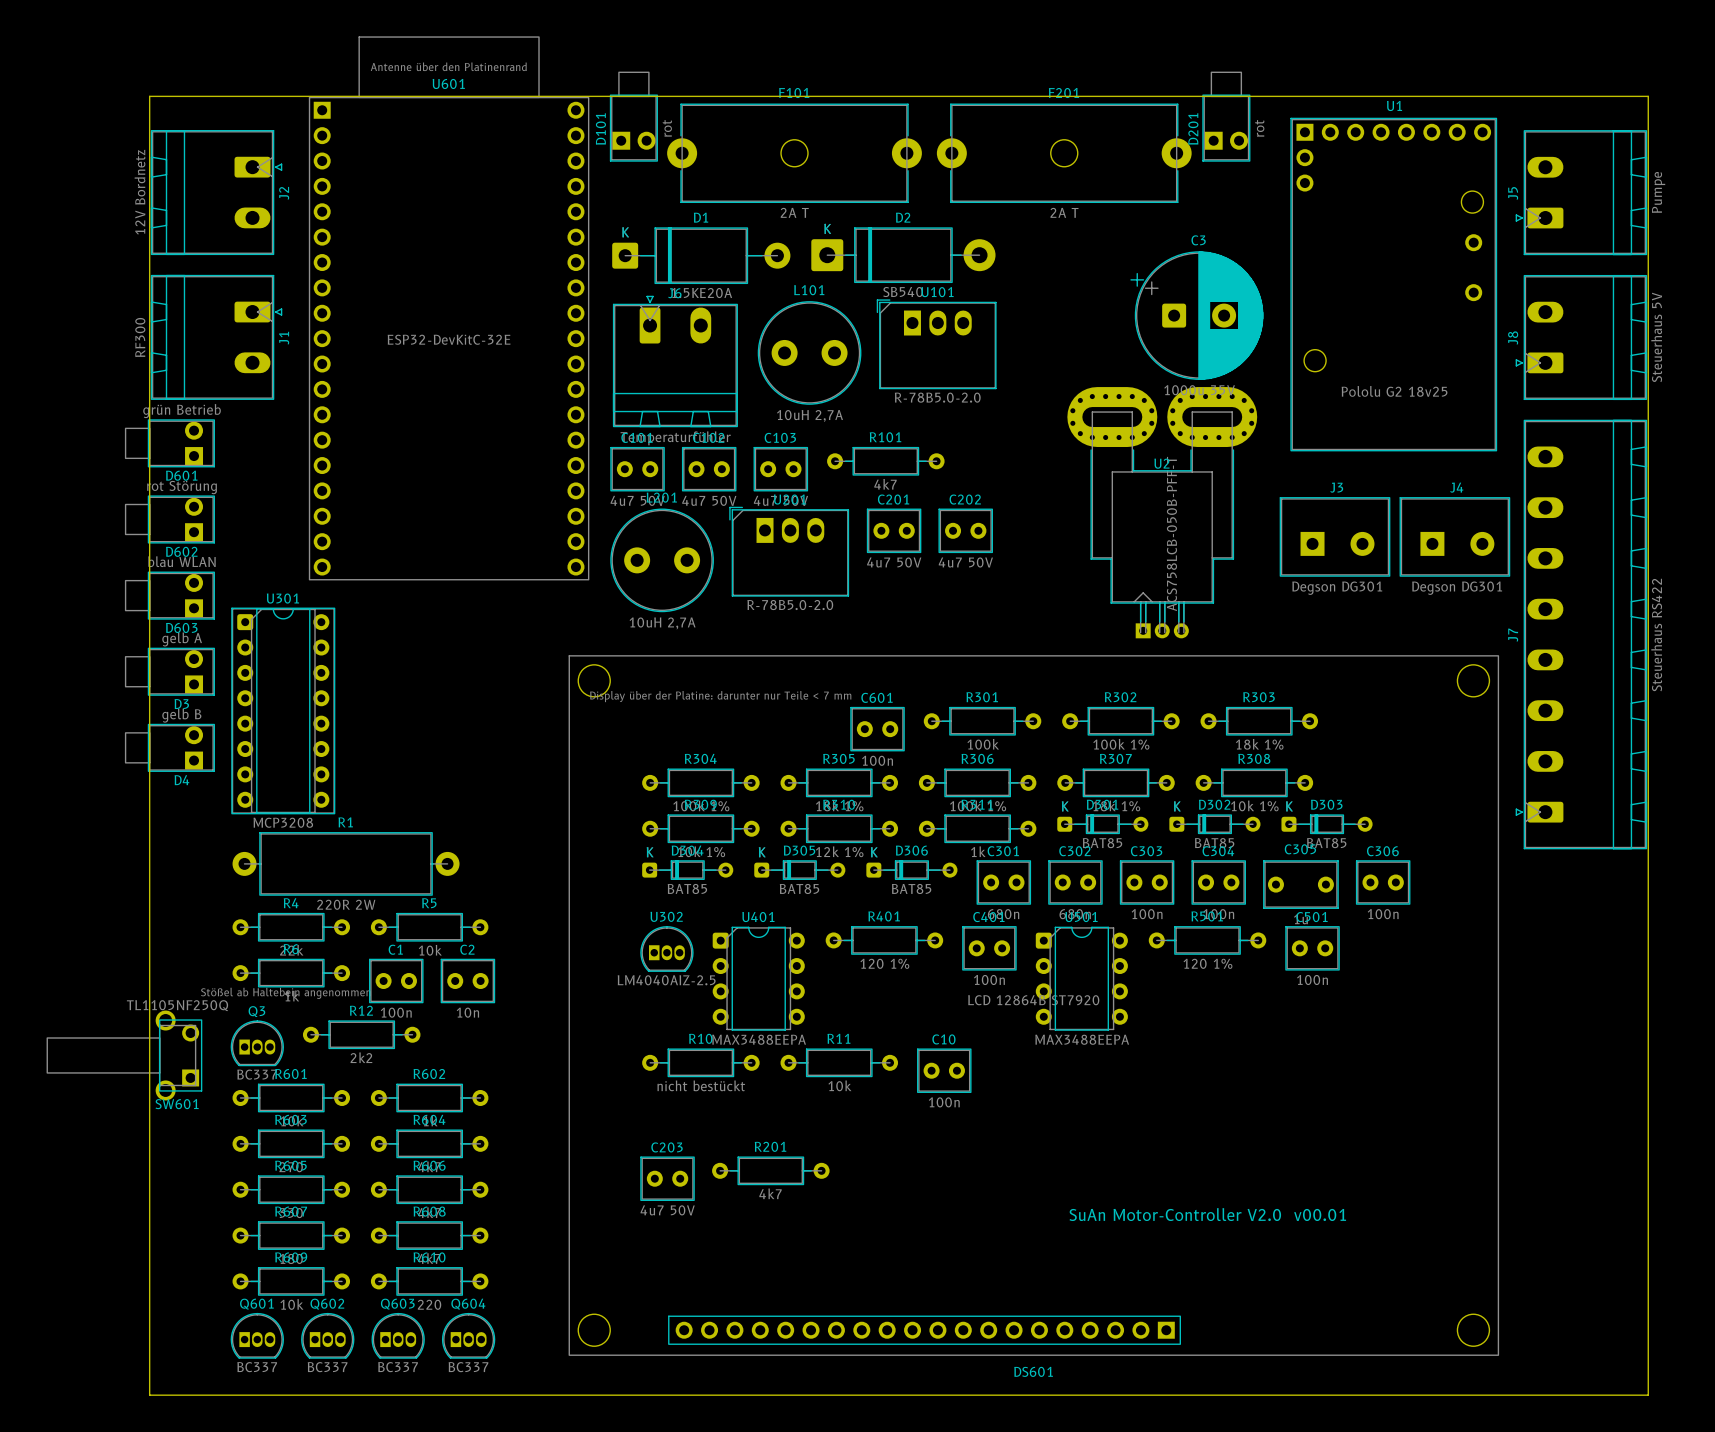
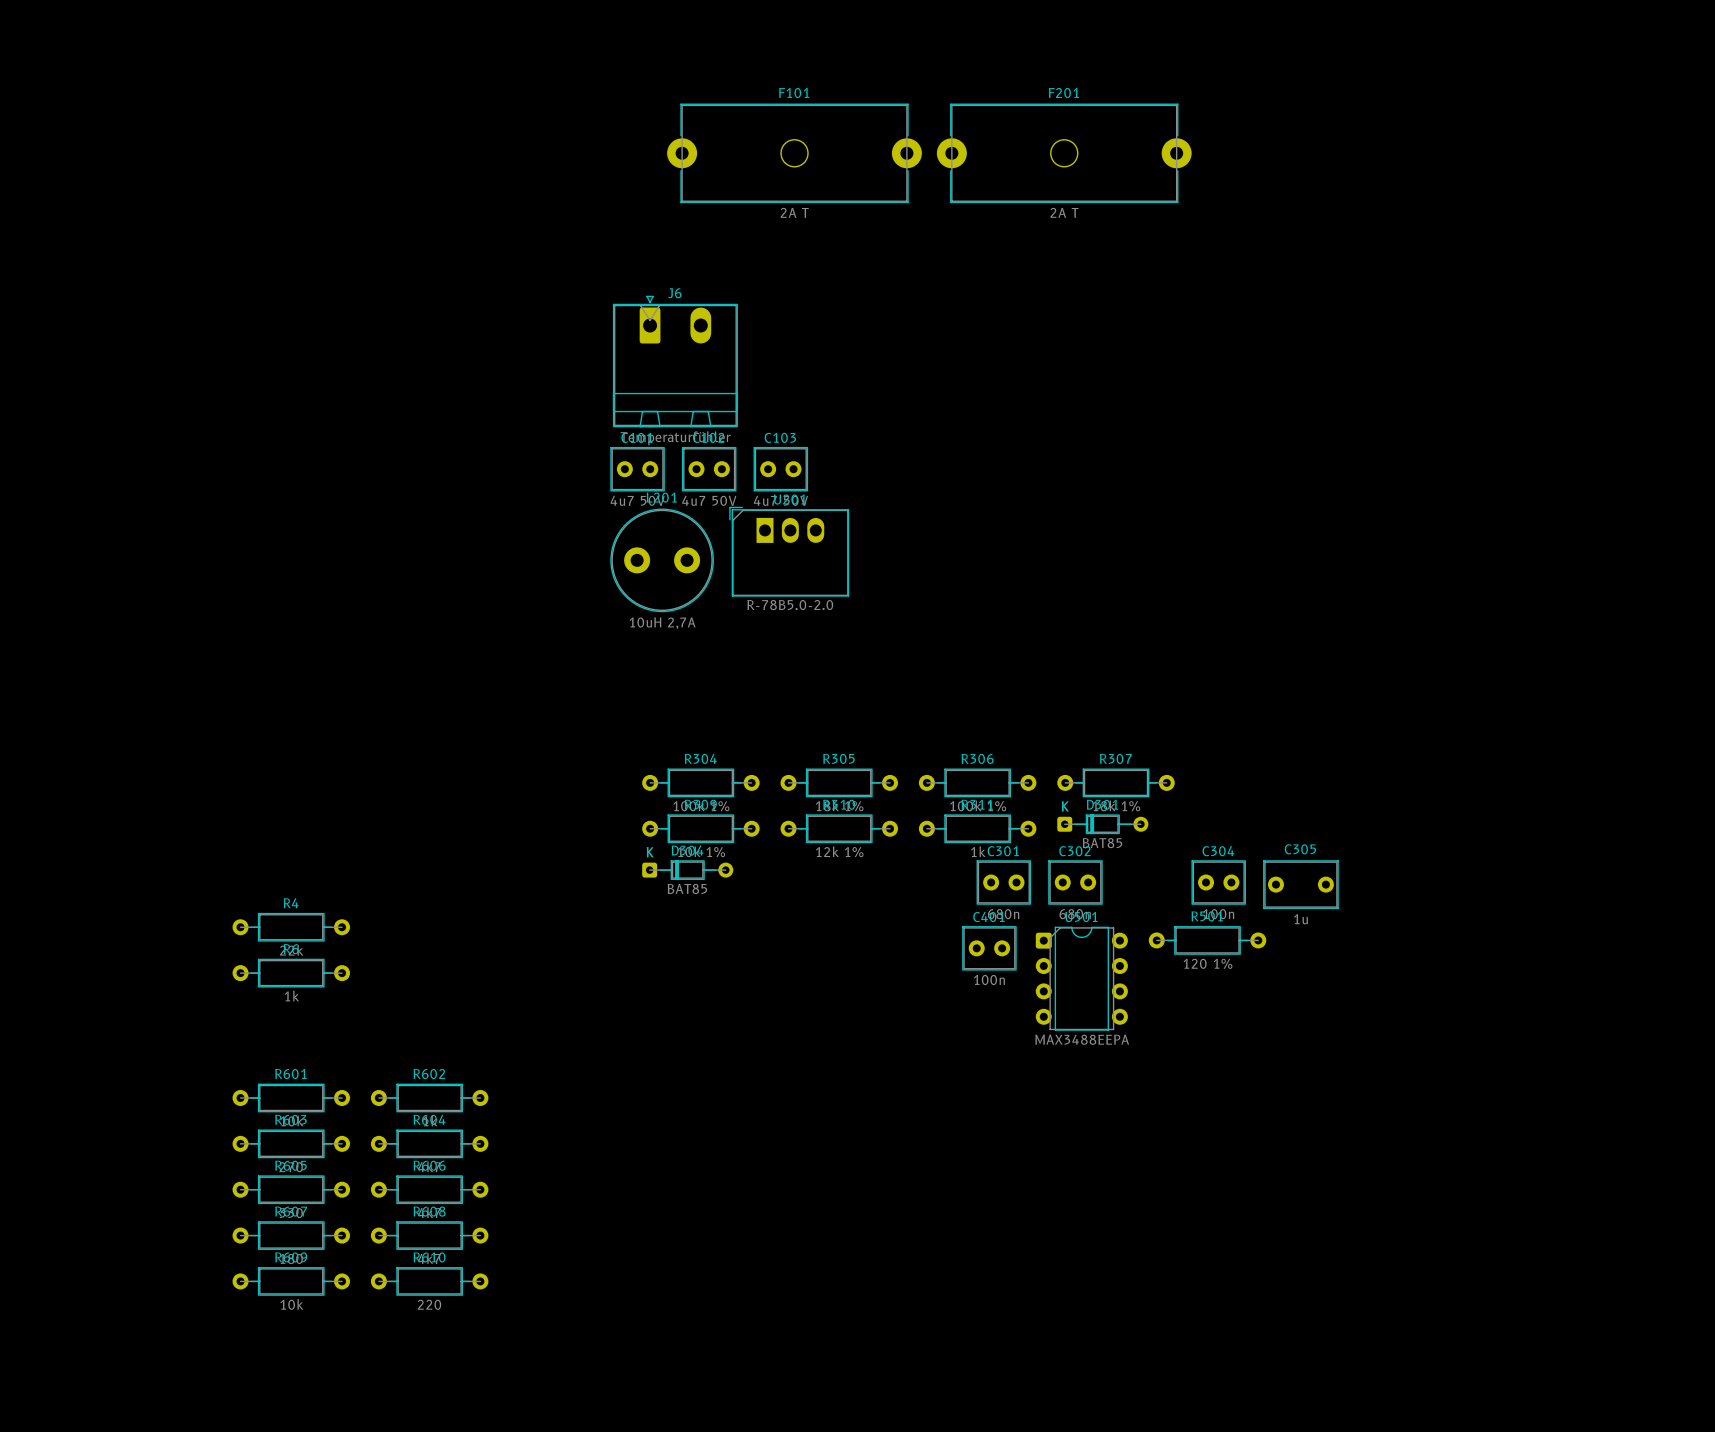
board edge: (149, 96) (1648, 96) (1648, 1395) (149, 1395) (149, 96) -> none
D101: rot (633, 116) -> none
D201: rot (1226, 116) -> none
J2: 12V Bordnetz (216, 192) -> none
J5: Pumpe (1581, 192) -> none
D1: 1.5KE20A (701, 255) -> none
D2: SB540 (903, 255) -> none
U1: Pololu G2 18v25 (1393, 284) -> none
U601: ESP32-DevKitC-32E (449, 308) -> none
C3: 1000u 35V (1196, 315) -> none
J1: RF300 (216, 337) -> none
J8: Steuerhaus 5V (1581, 337) -> none
U101: R-78B5.0-2.0 (936, 344) -> none
L101: 10uH 2,7A (809, 352) -> none
D601: grün Betrieb (169, 443) -> none
R101: 4k7 (885, 461) -> none
U2: ACS758LCB-050B-PFF-T (1162, 512) -> none
D602: rot Störung (169, 519) -> none
C201: 4u7 50V (894, 530) -> none
C202: 4u7 50V (965, 530) -> none
J3: Degson DG301 (1335, 536) -> none
J4: Degson DG301 (1454, 536) -> none
D603: blau WLAN (169, 595) -> none
J7: Steuerhaus RS422 (1581, 634) -> none
D3: gelb A (169, 671) -> none
U301: MCP3208 (283, 710) -> none
R301: 100k (982, 721) -> none
R302: 100k 1% (1120, 721) -> none
R303: 18k 1% (1259, 721) -> none
C601: 100n (877, 729) -> none
D4: gelb B (169, 747) -> none
R308: 10k 1% (1254, 782) -> none
D302: BAT85 (1214, 824) -> none
D303: BAT85 (1327, 824) -> none
R1: 220R 2W (346, 863) -> none
D305: BAT85 (799, 870) -> none
D306: BAT85 (911, 870) -> none
C303: 100n (1147, 882) -> none
C306: 100n (1383, 882) -> none
R5: 10k (429, 927) -> none
R401: 120 1% (884, 940) -> none
U302: LM4040AIZ-2.5 (666, 948) -> none
C501: 100n (1312, 948) -> none
U401: MAX3488EEPA (758, 978) -> none
C1: 100n (396, 981) -> none
C2: 10n (467, 981) -> none
DS601: LCD 12864B ST7920 (1033, 1005) -> none
R12: 2k2 (361, 1034) -> none
Q3: BC337 (257, 1043) -> none
SW601: TL1105NF250Q (124, 1055) -> none
R10: nicht bestückt (700, 1062) -> none
R11: 10k (839, 1062) -> none
C10: 100n (944, 1070) -> none
R201: 4k7 (770, 1170) -> none
C203: 4u7 50V (667, 1178) -> none
text: SuAn Motor-Controller V2.0 v00.01 (1207, 1214) -> none
Q601: BC337 (257, 1335) -> none
Q602: BC337 (327, 1335) -> none
Q603: BC337 (398, 1335) -> none
Q604: BC337 (468, 1335) -> none

